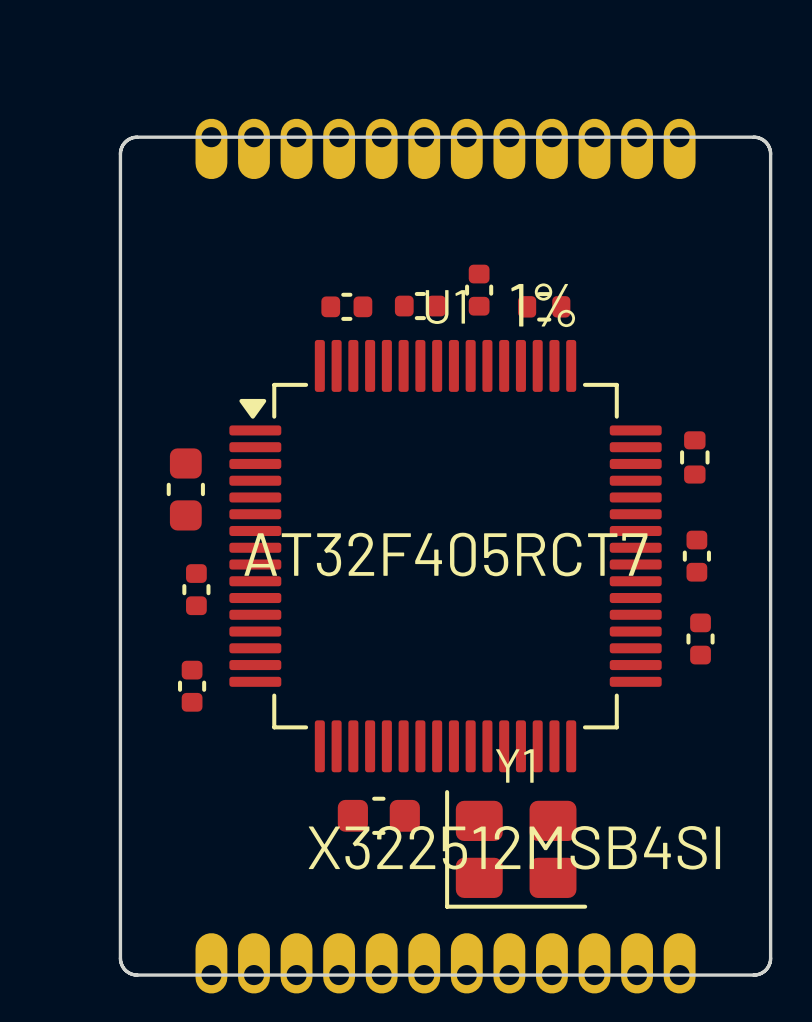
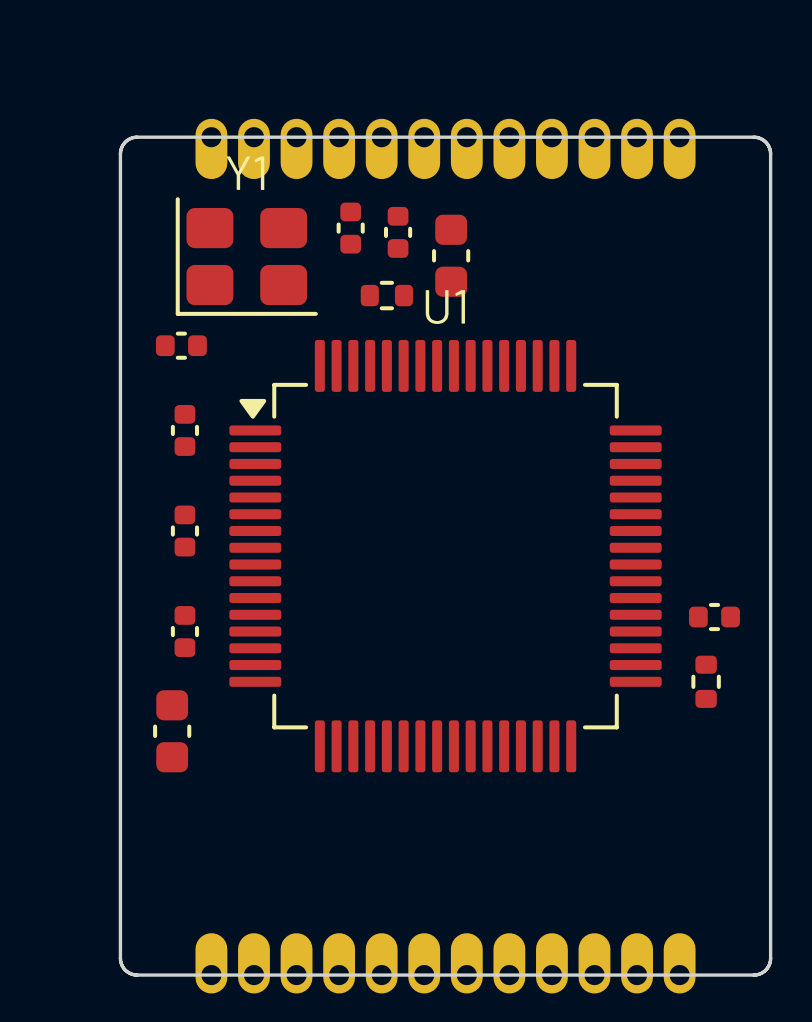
part: none -> (350, 228)
part: none -> (398, 232)
part: none -> (451, 255)
part: (479, 290) -> none
part: none -> (386, 295)
part: (346, 306) -> none
part: (420, 306) -> none
part: (544, 306) -> none
part: none -> (181, 345)
part: none -> (184, 430)
part: (694, 457) -> none
part: (185, 489) -> none
part: none -> (184, 530)
U1 text: AT32F405RCT7 (445, 554) -> none
part: (696, 556) -> none
part: (196, 589) -> none
part: none -> (184, 631)
part rotation: 0° (700, 638) -> 90° clockwise (714, 617)
part: none -> (706, 681)
part: (192, 686) -> none
part: none -> (172, 731)
part: (378, 815) -> none
Y1 text: X322512MSB4SI (514, 847) -> none
Y1 position: (516, 849) -> (246, 256)

